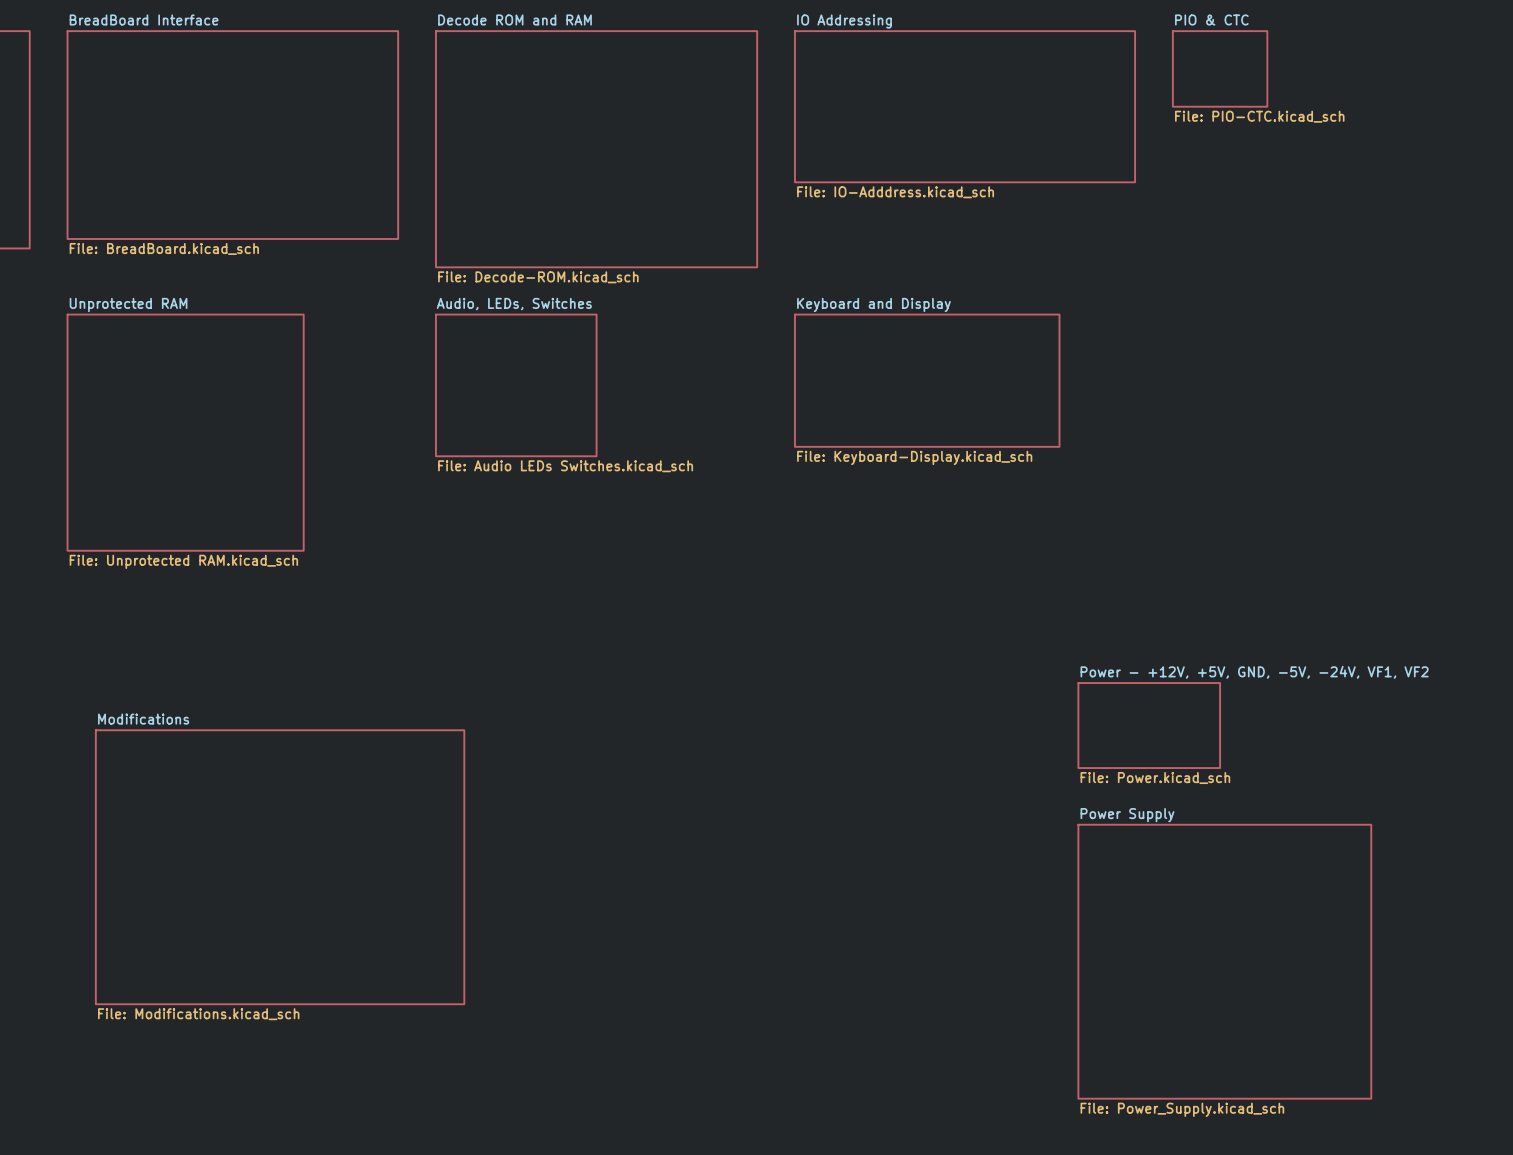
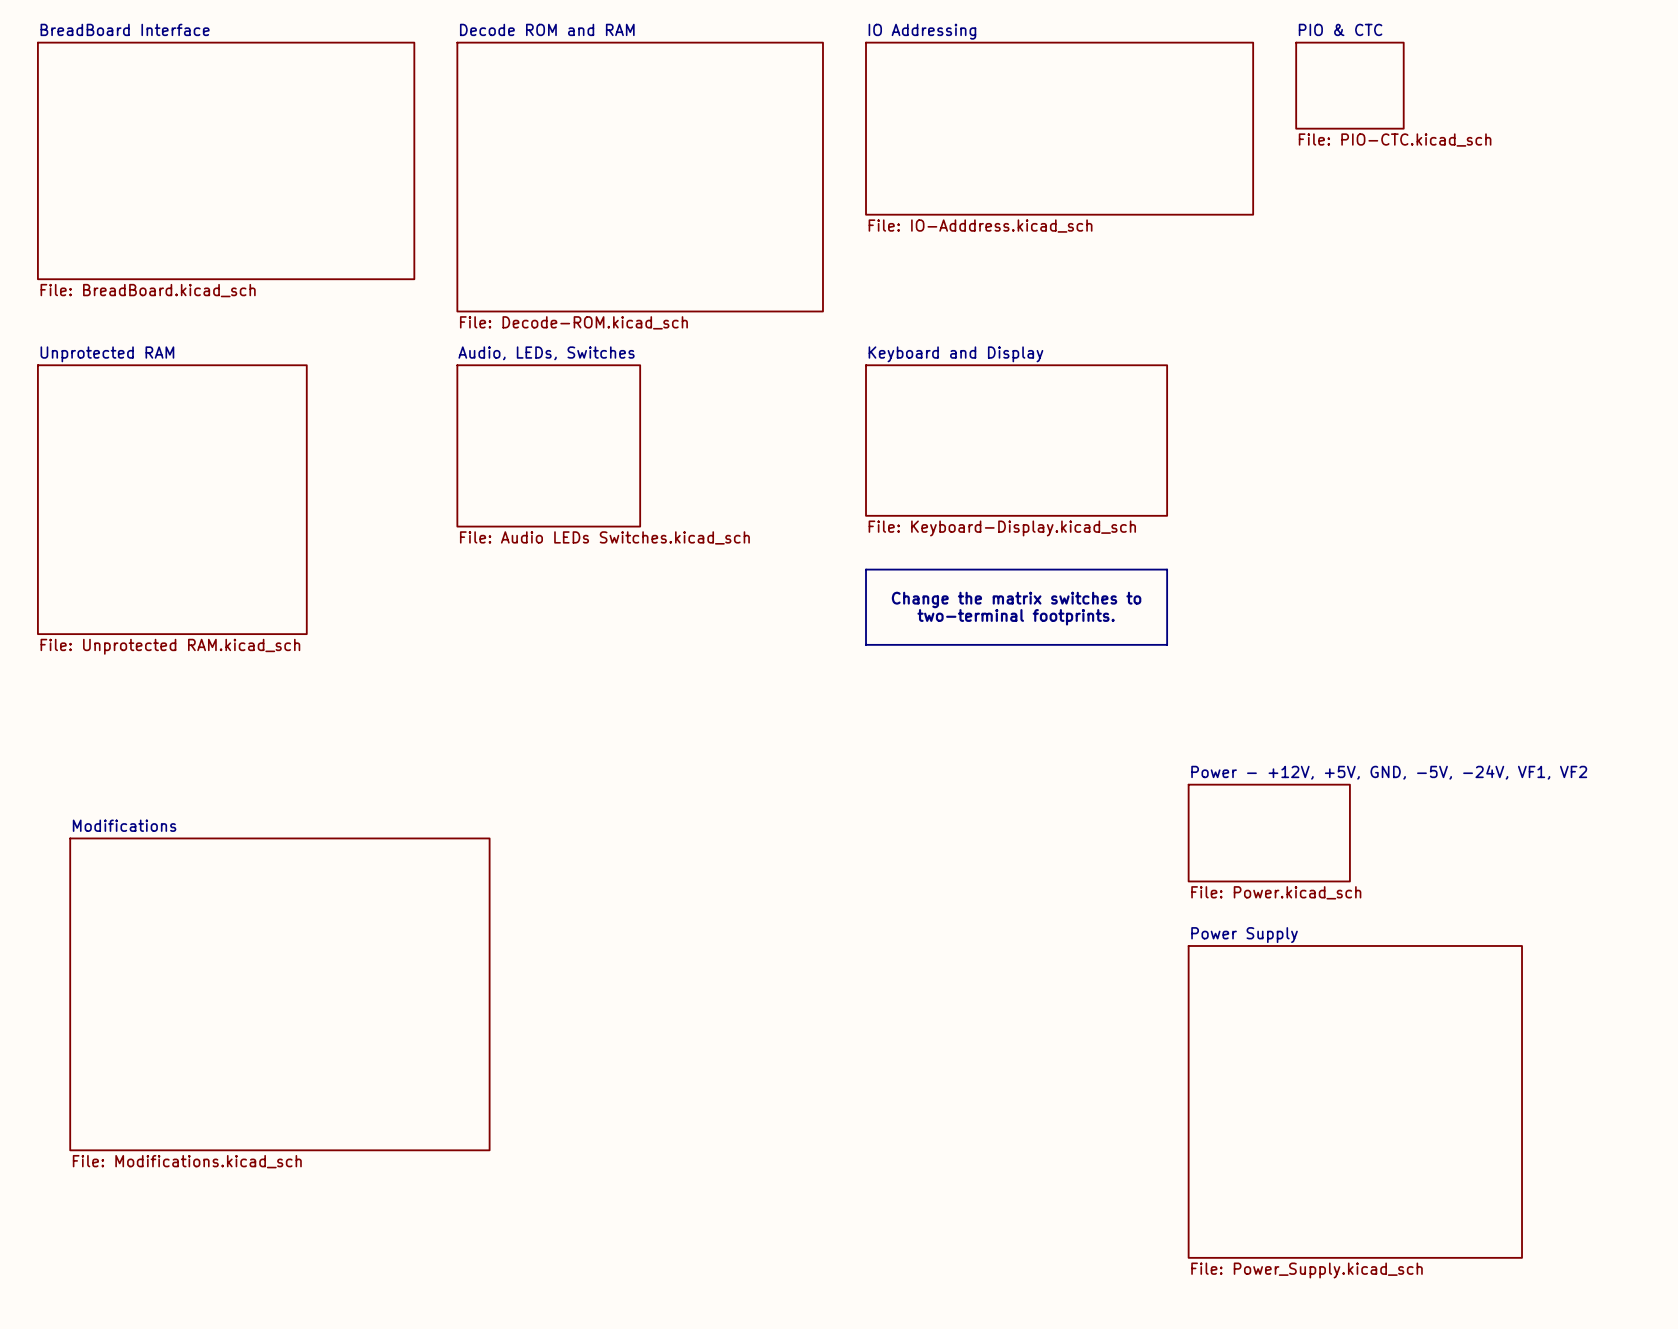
line: none -> (866, 569) (1167, 569) (1167, 644) (866, 644) (866, 569)
text: none -> Change the matrix switches to (1016, 599)
text: none -> two-terminal footprints. (1016, 617)

